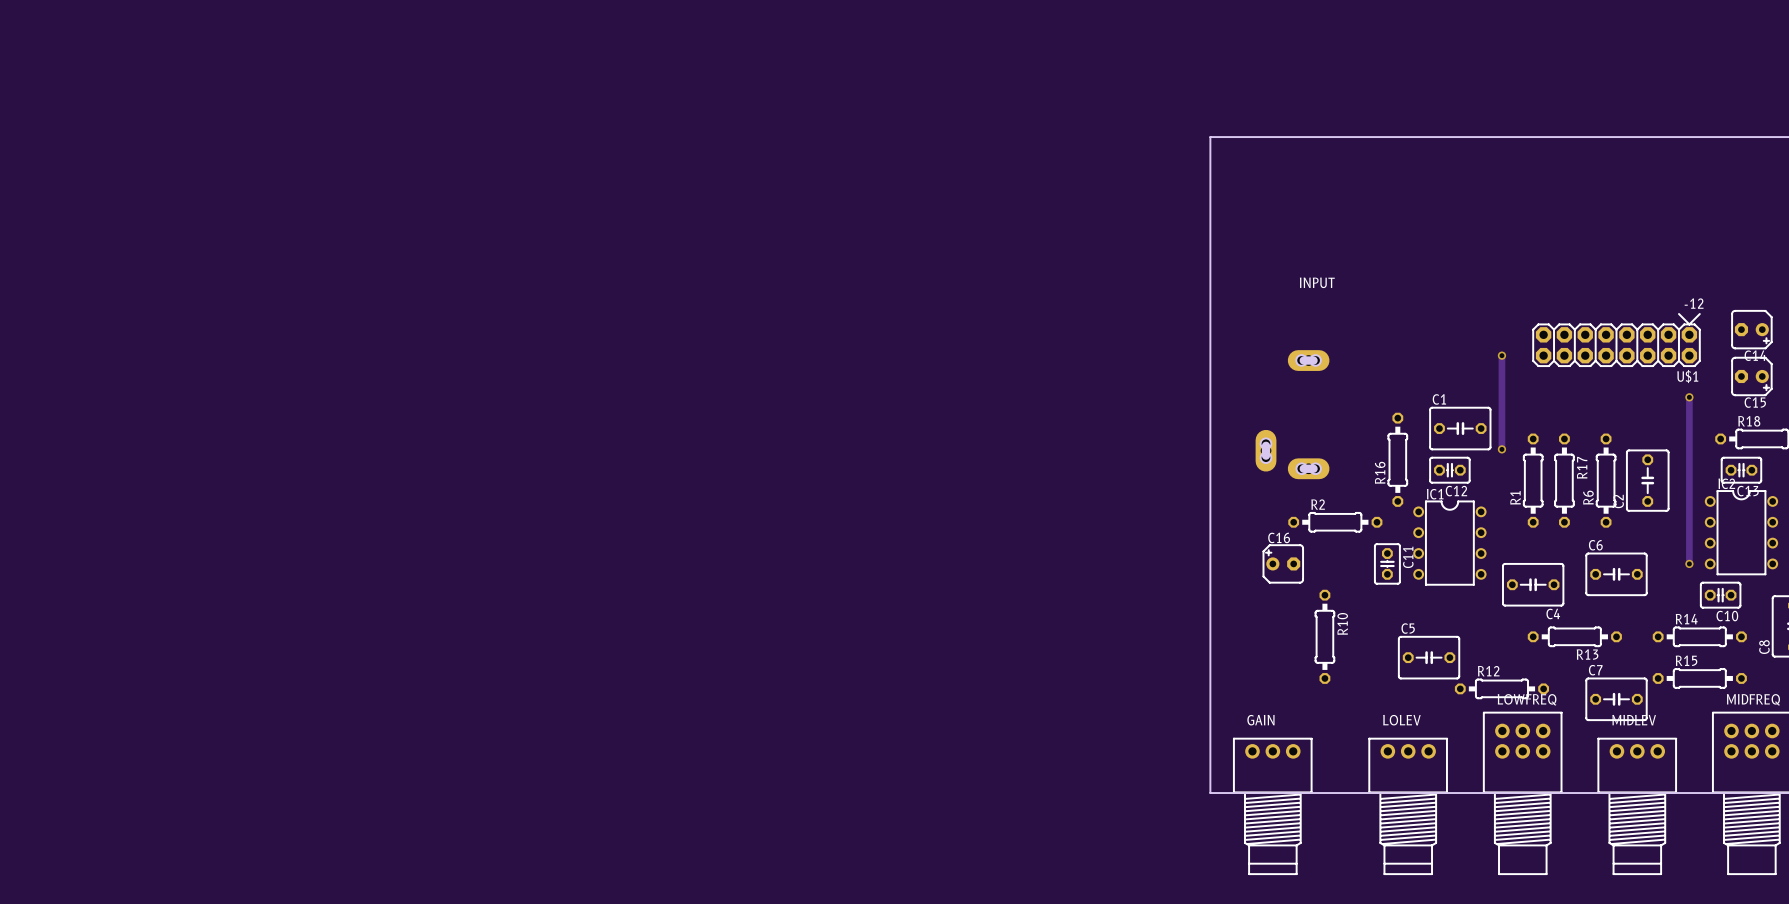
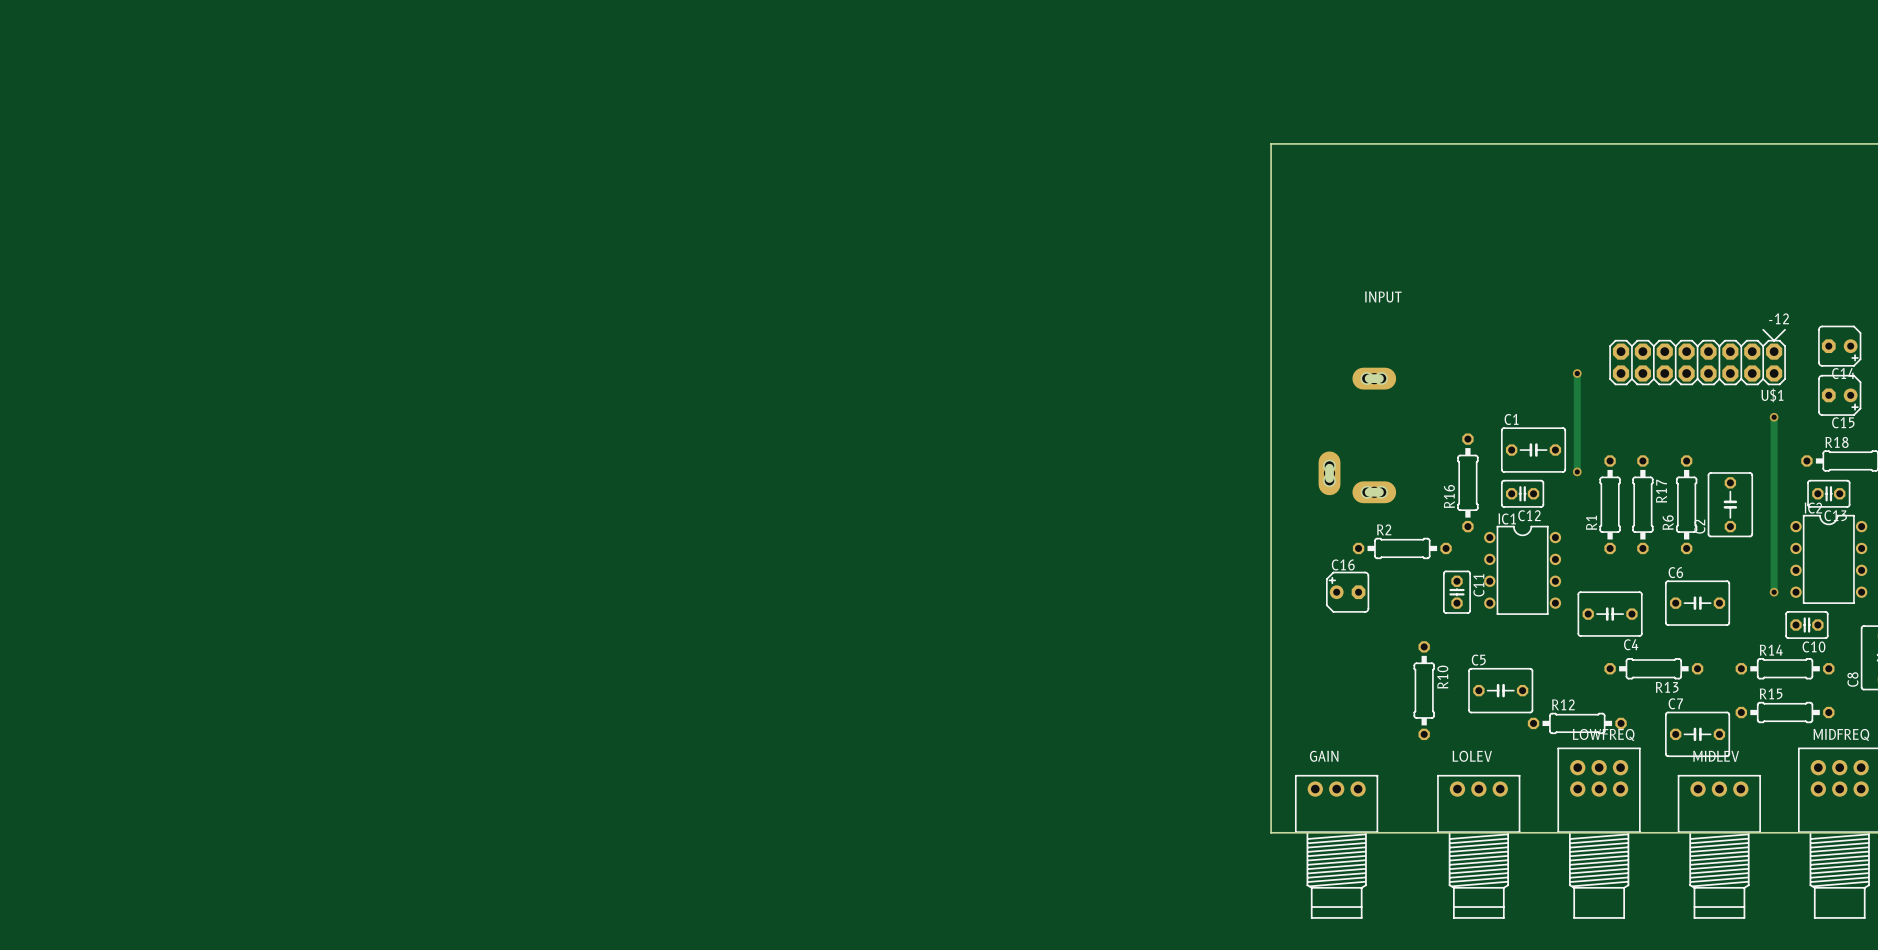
R10 position: (1324, 636) -> (1424, 690)

